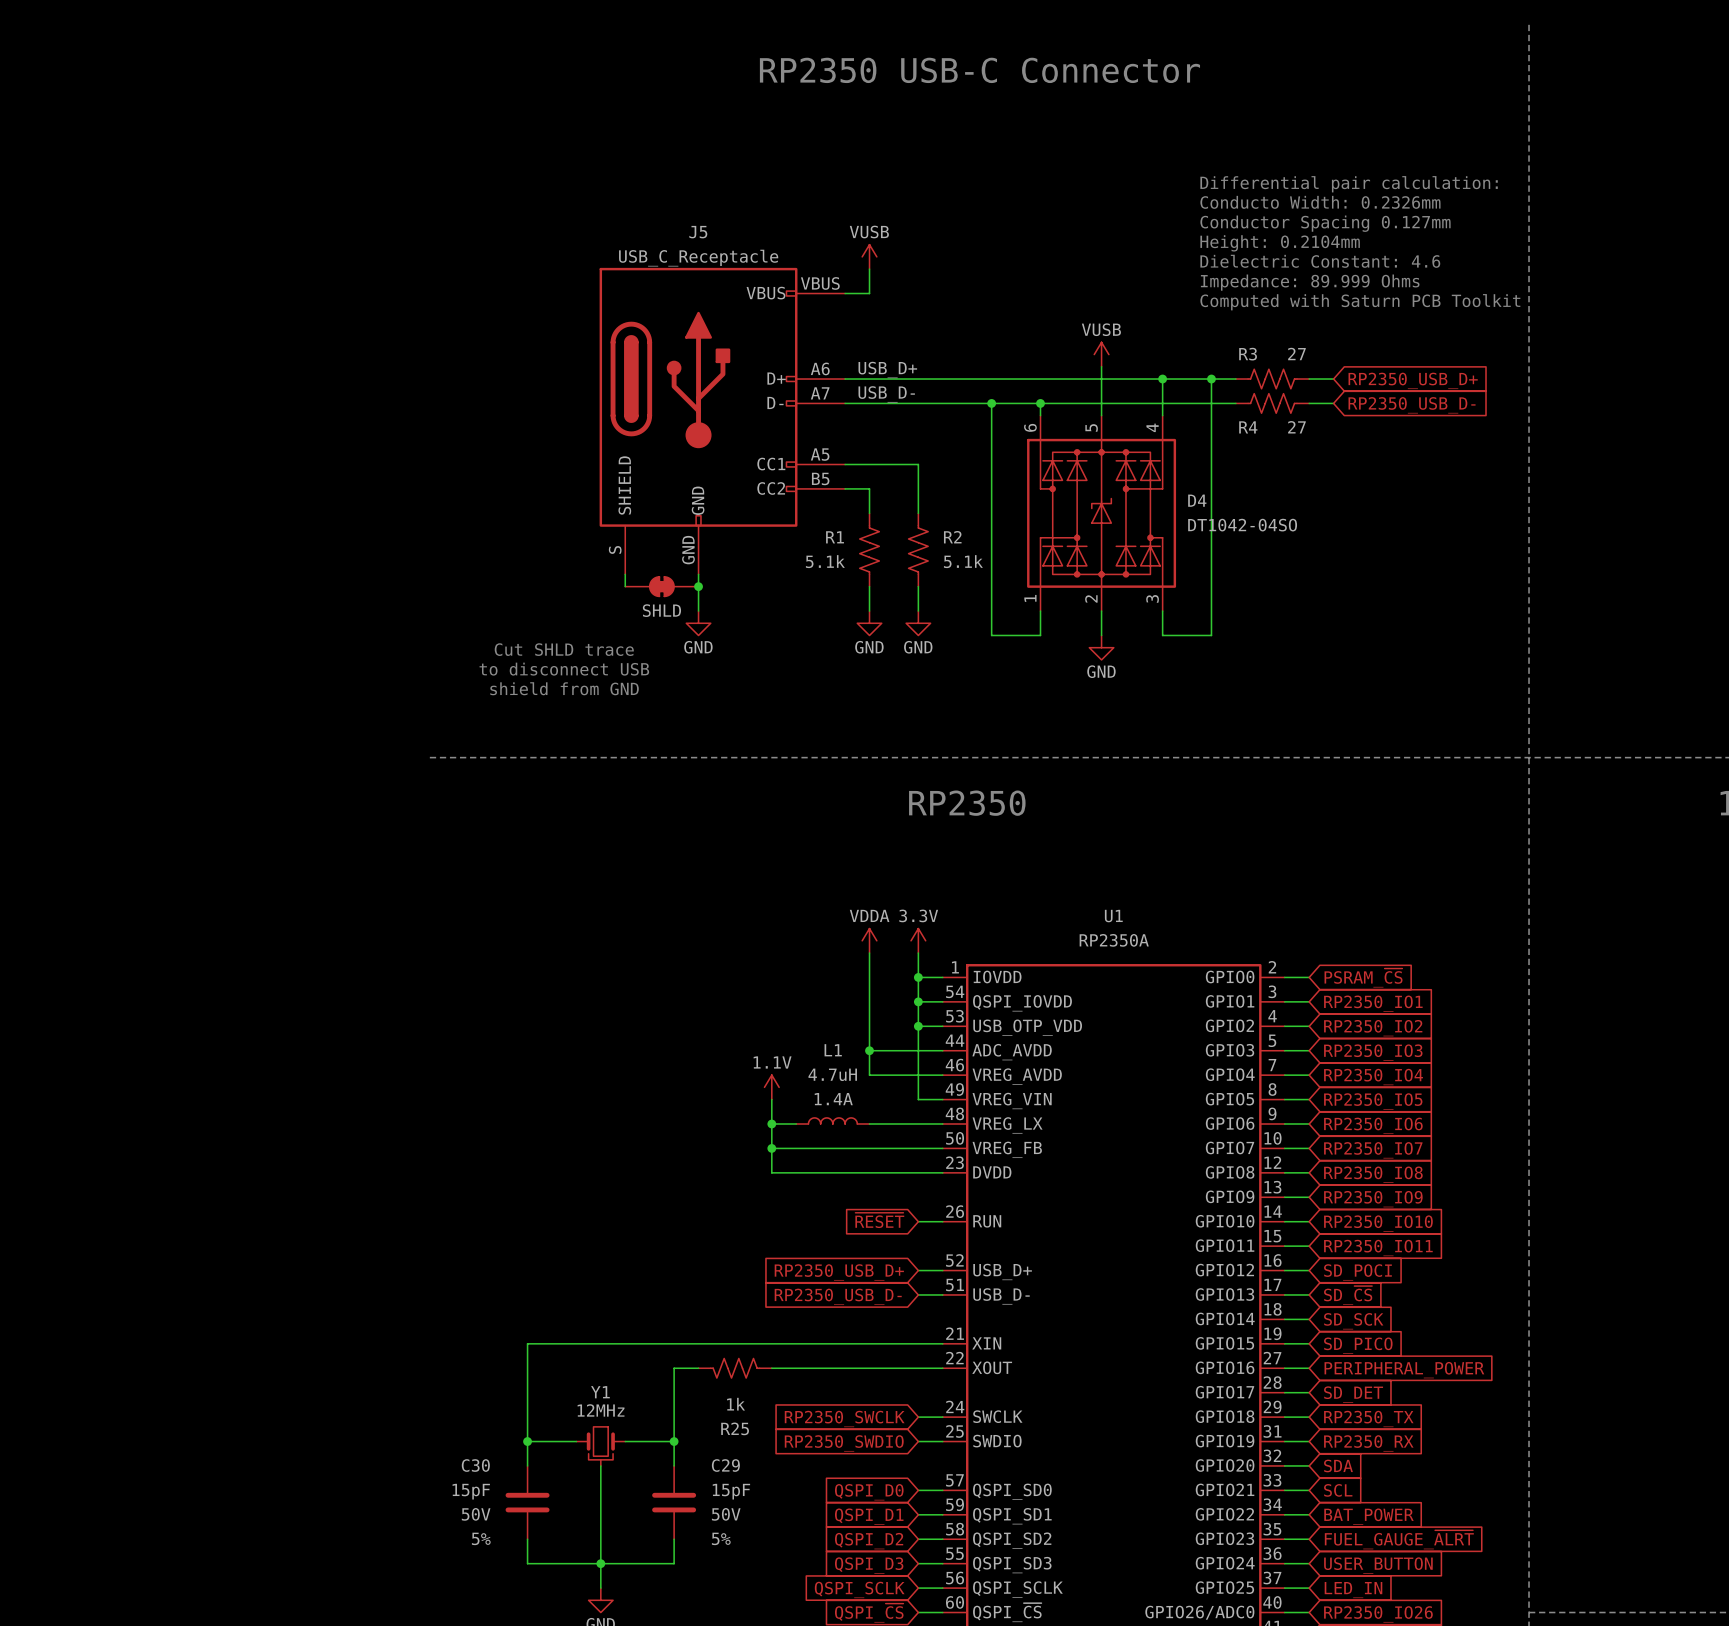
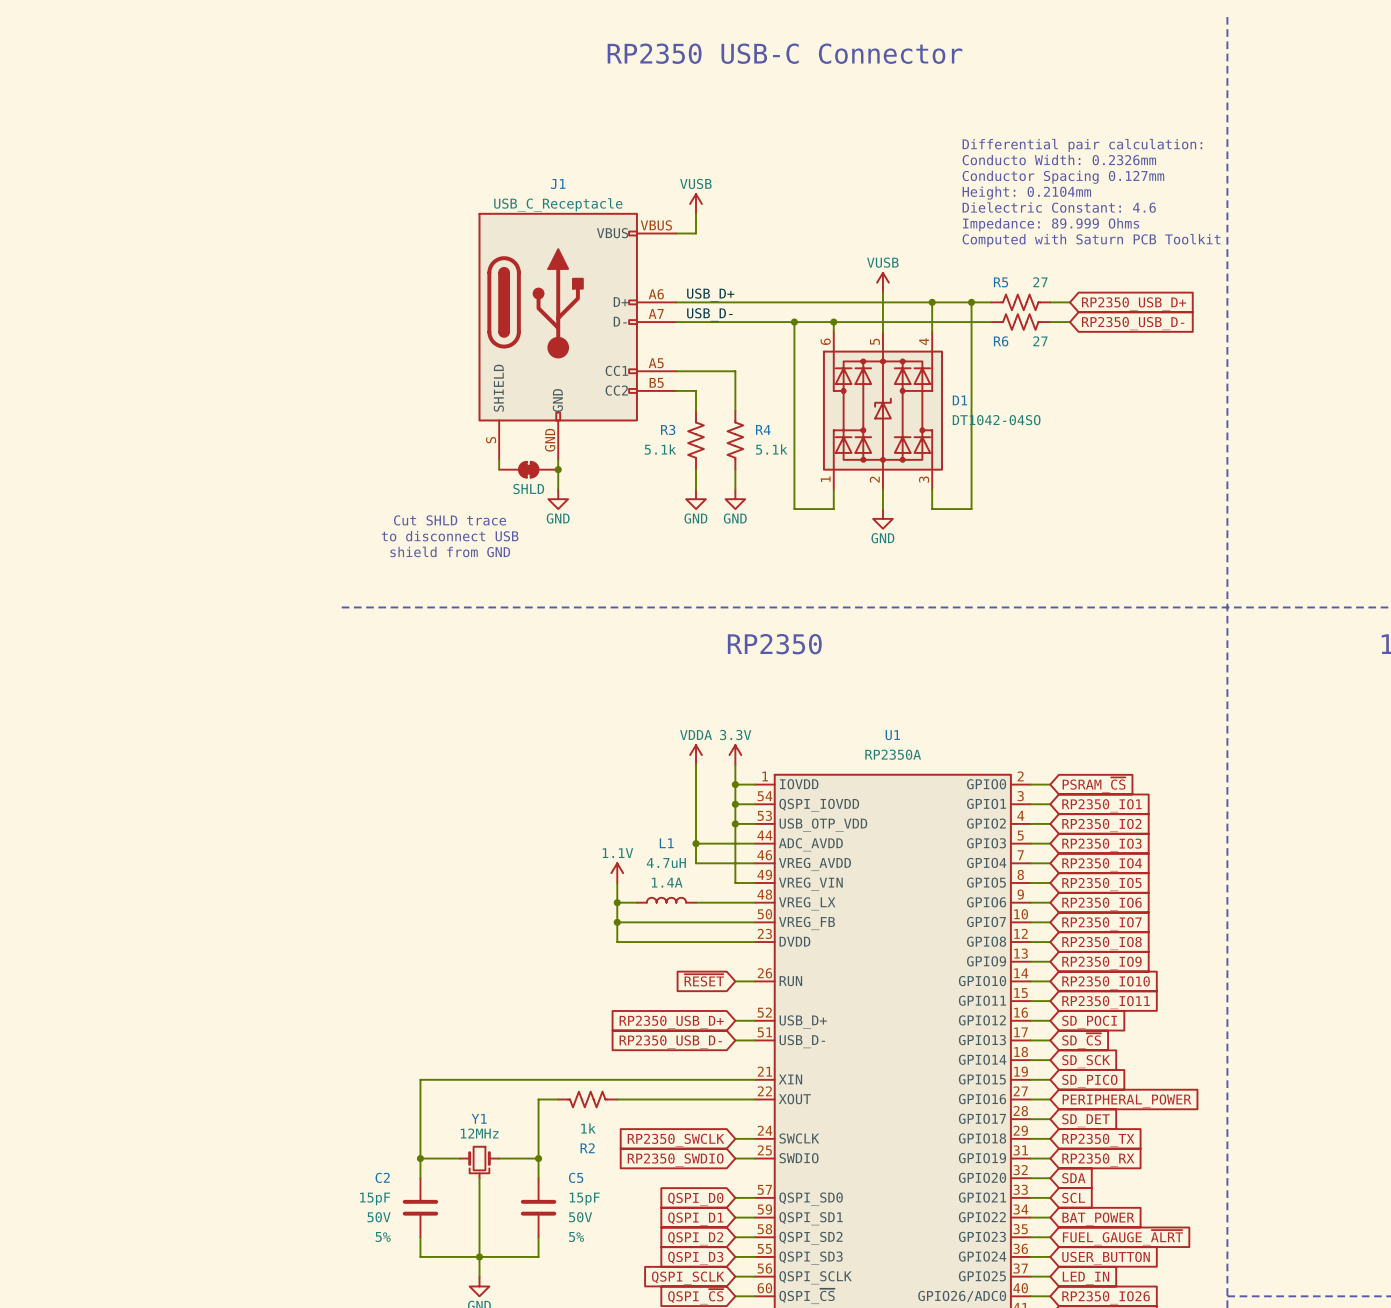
J5 name: J5 (698, 232) -> J1 (558, 184)
R3 name: R3 (1248, 354) -> R5 (1001, 282)
R4 name: R4 (1248, 427) -> R6 (1001, 341)
D4 name: D4 (1197, 500) -> D1 (959, 400)
R1 name: R1 (835, 537) -> R3 (668, 429)
R2 name: R2 (952, 537) -> R4 (763, 429)
R25 name: R25 (735, 1428) -> R2 (587, 1148)
C30 name: C30 (475, 1465) -> C2 (382, 1177)
C29 name: C29 (725, 1465) -> C5 (576, 1177)

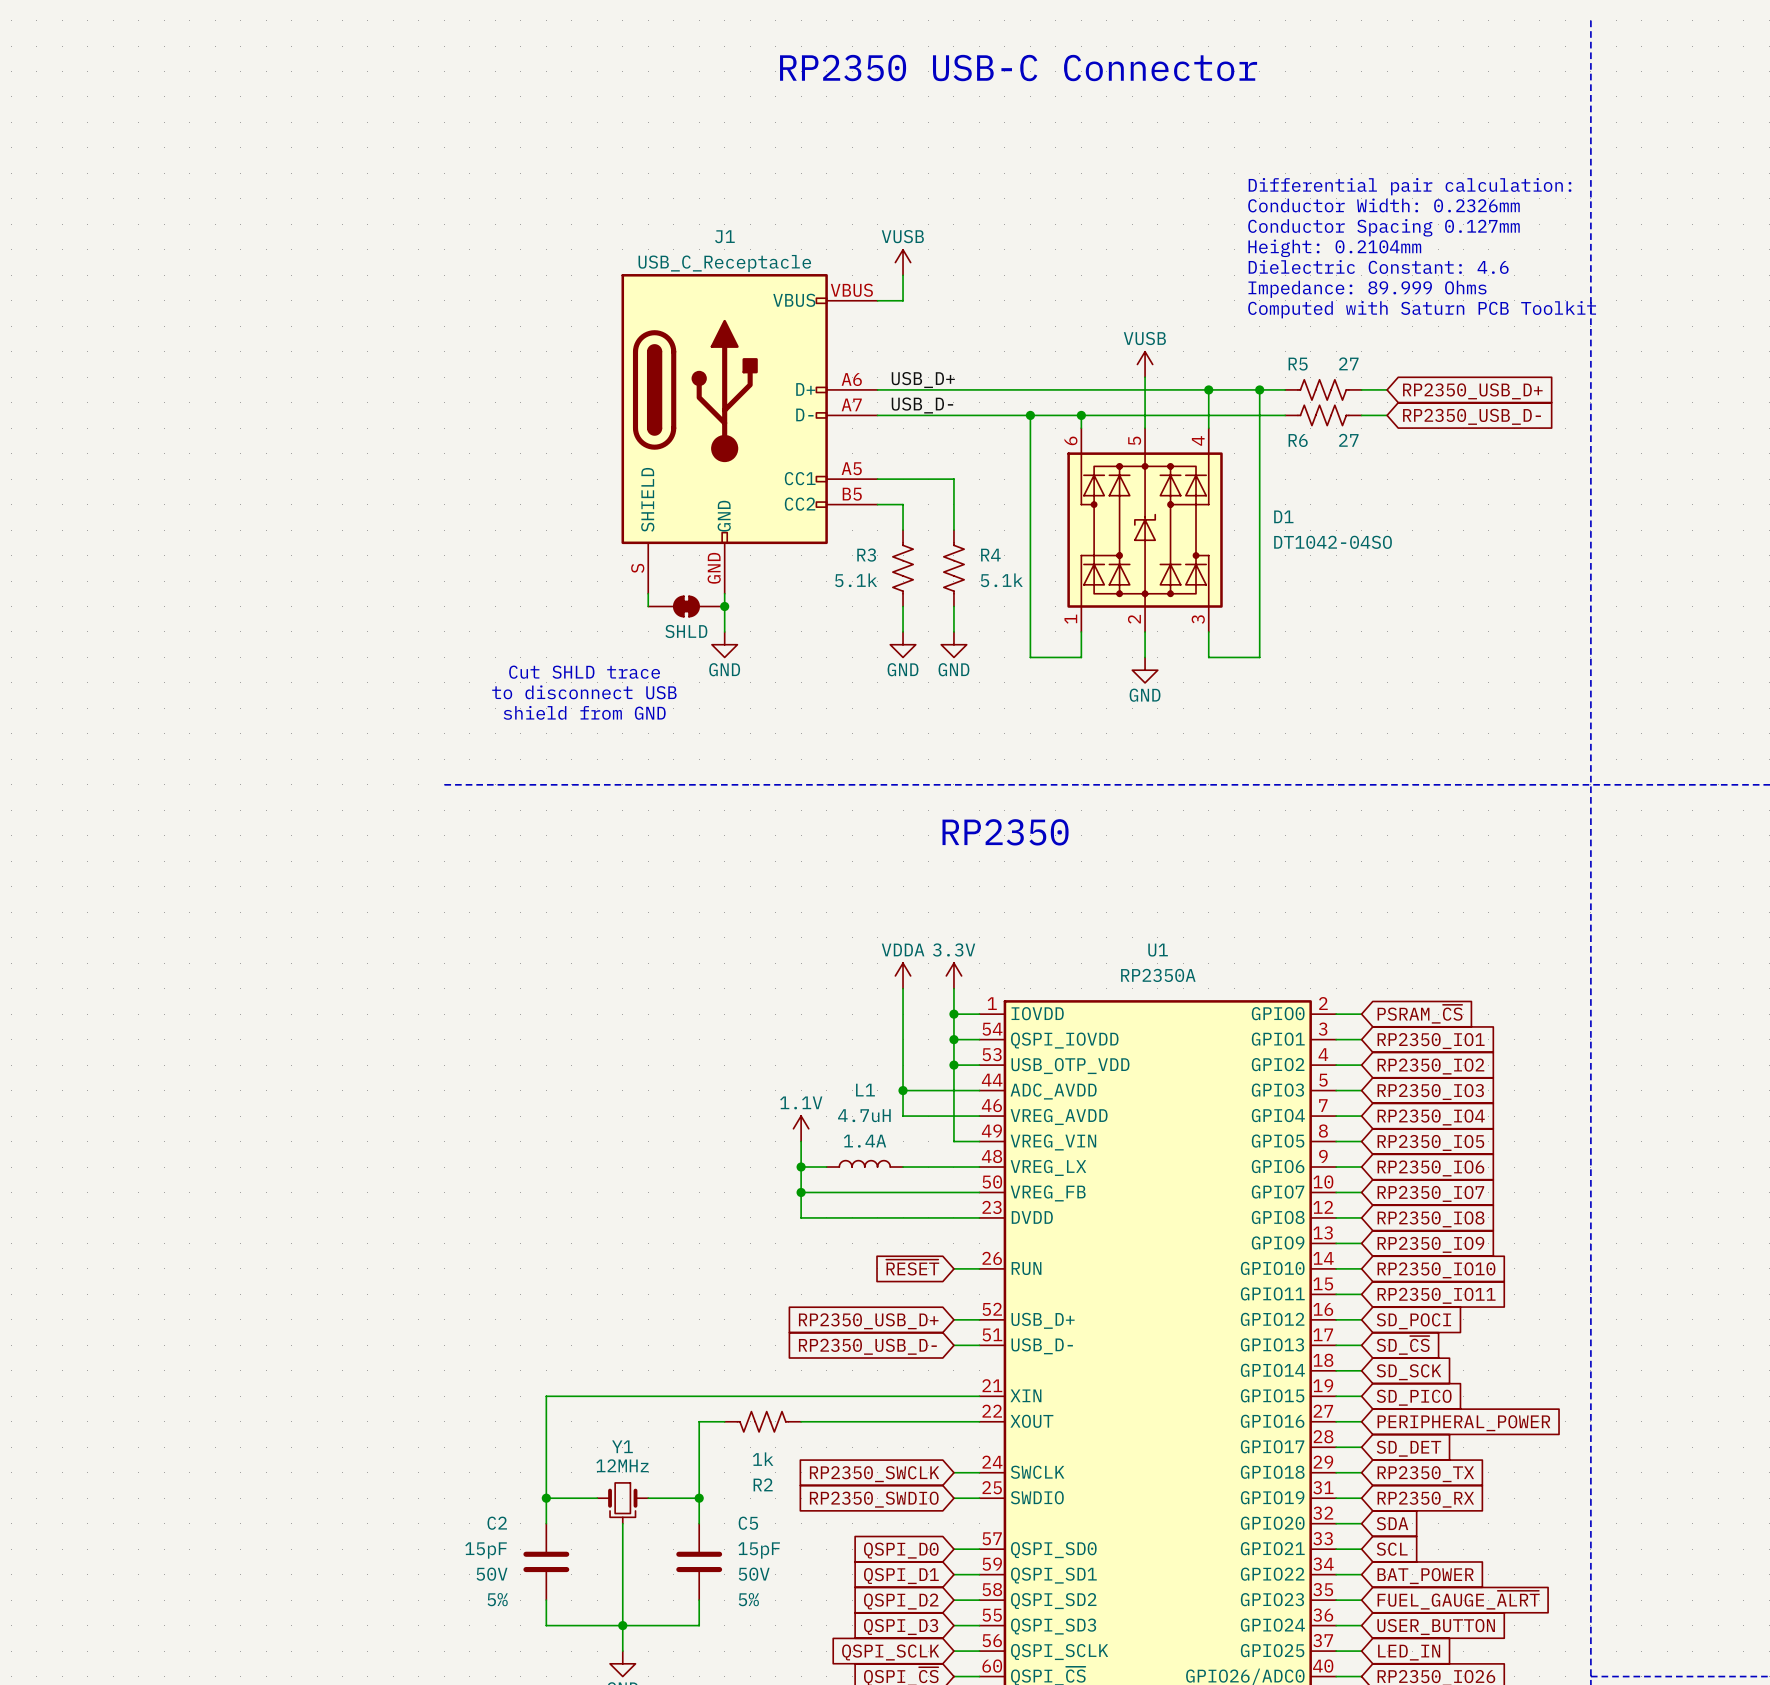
text: Conducto Width: 0.2326mm (1059, 160) -> Conductor Width: 0.2326mm (1383, 205)
D1 name position: D1 (959, 400) -> D1 (1283, 516)
D1 value position: DT1042-04SO (996, 420) -> DT1042-04SO (1333, 542)

